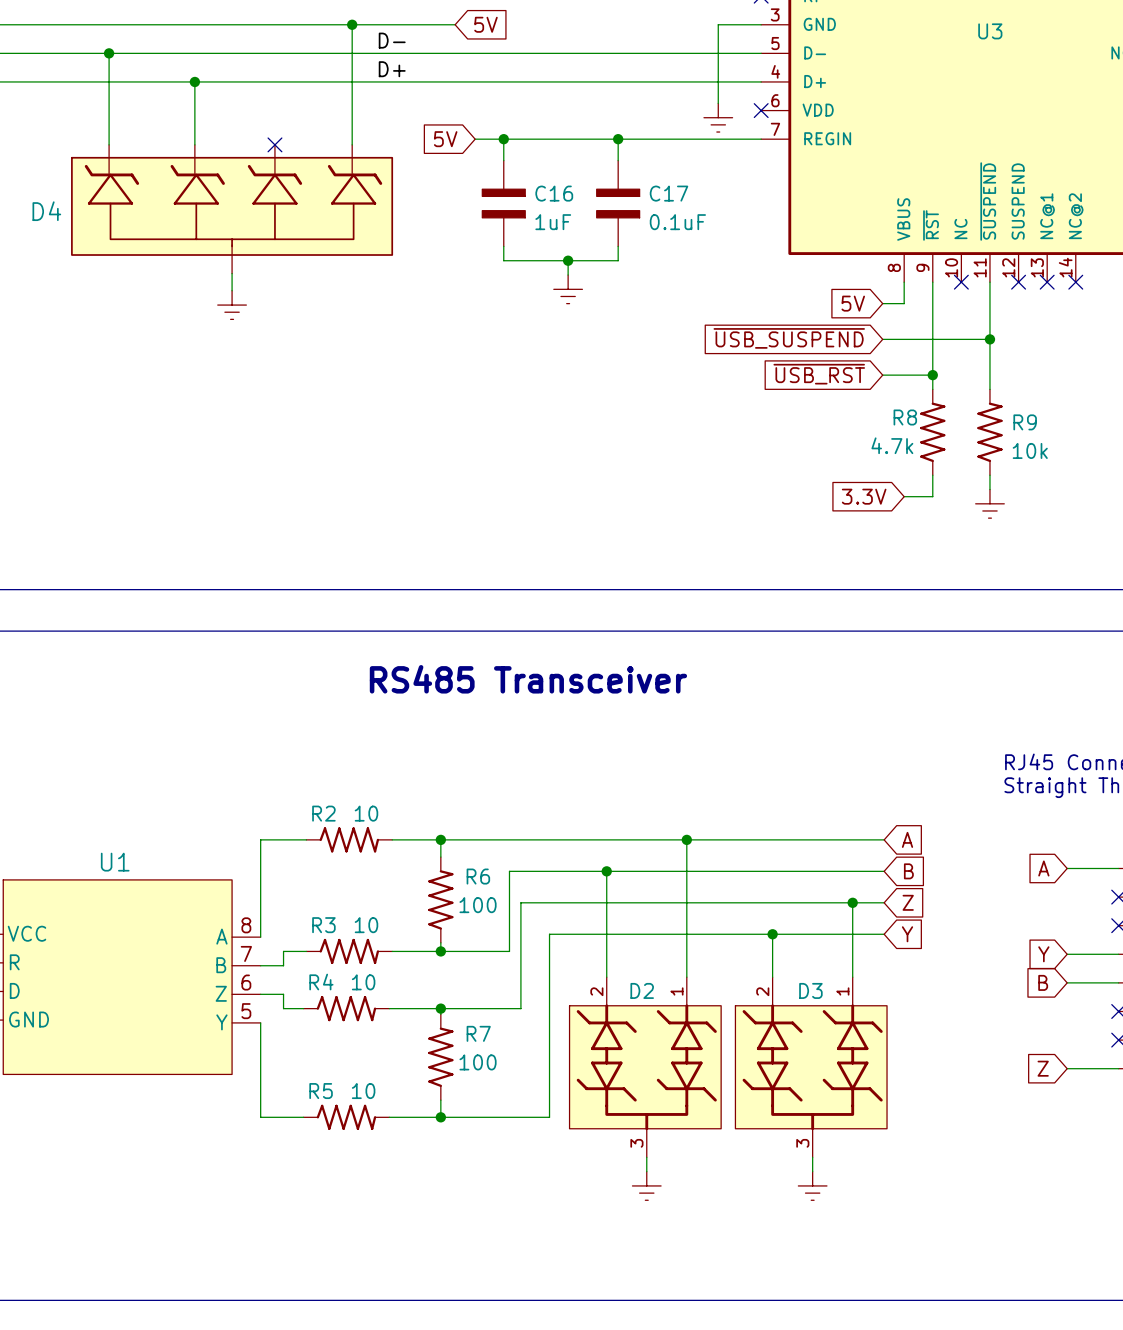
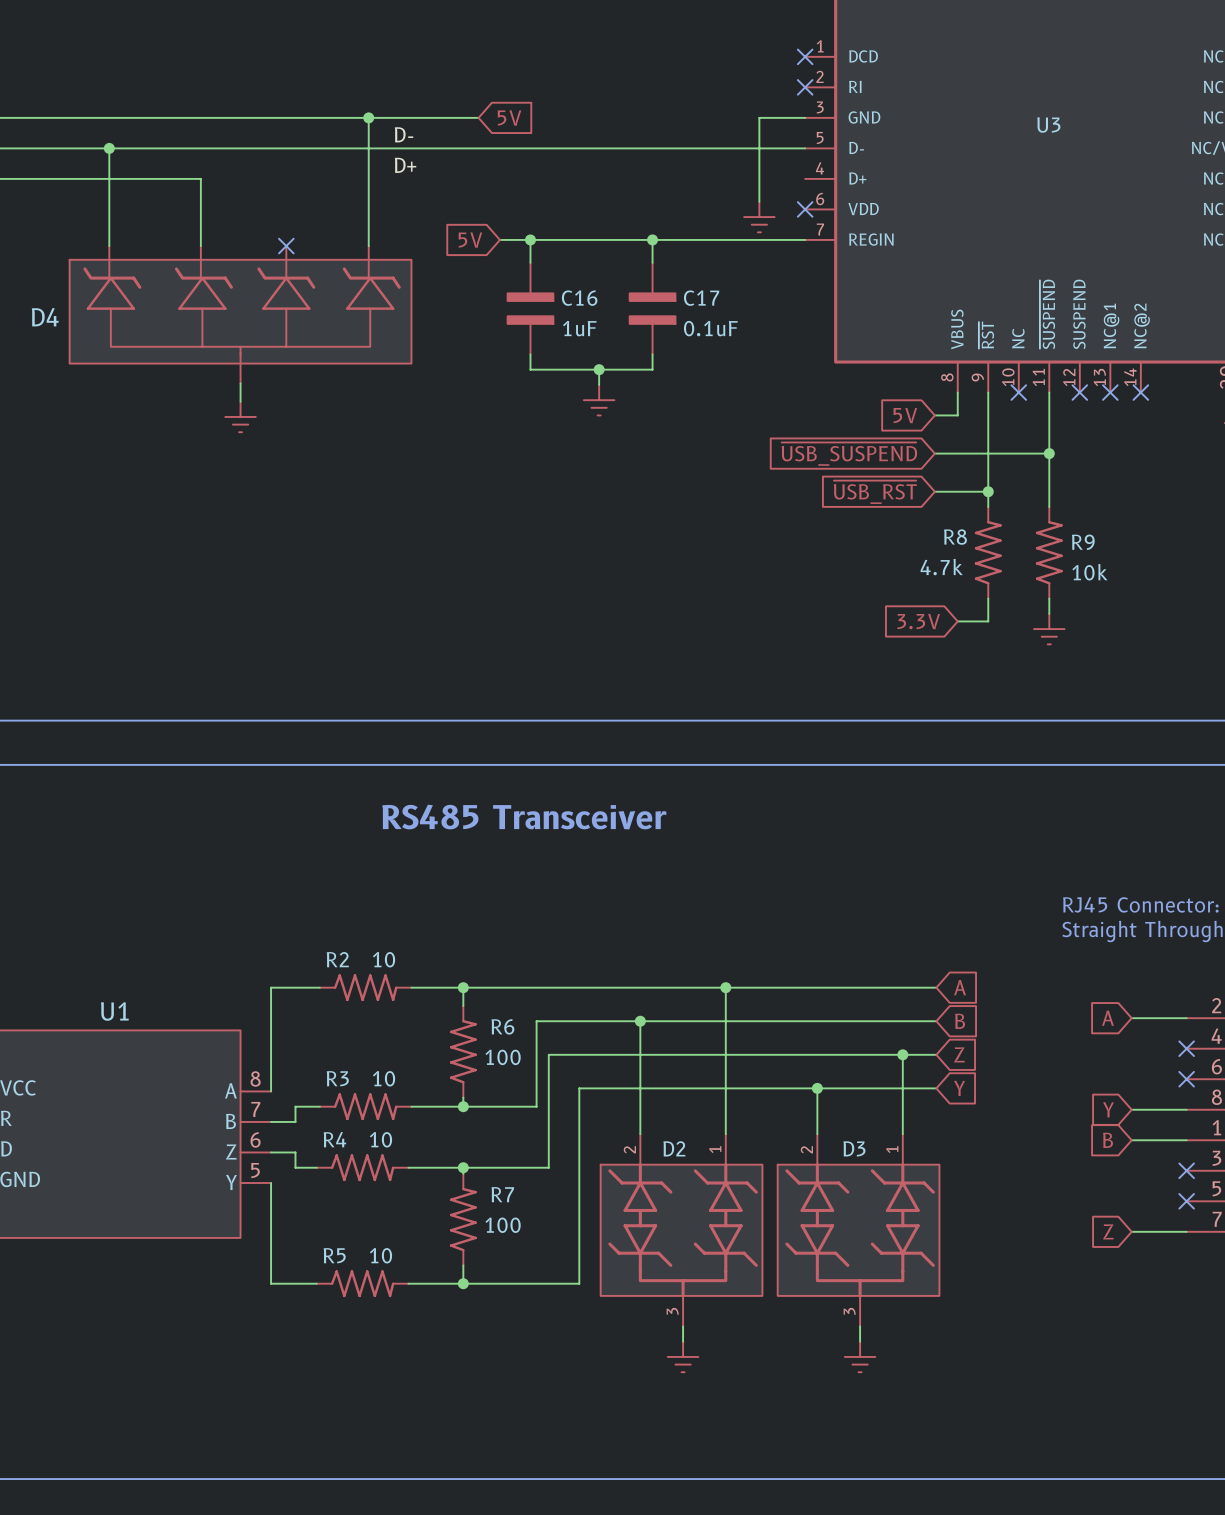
wire: (194, 81) (761, 81) -> none
junction: (194, 81) -> none

